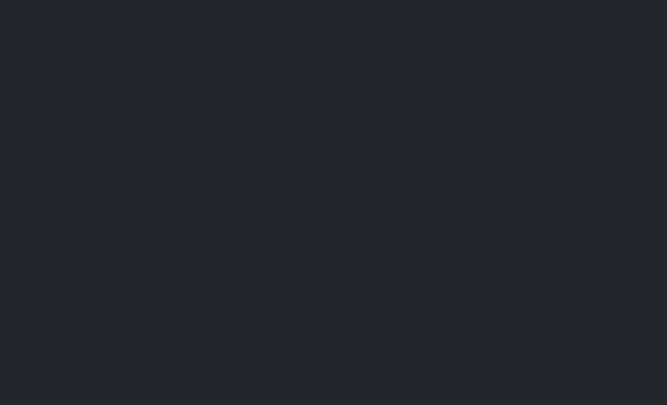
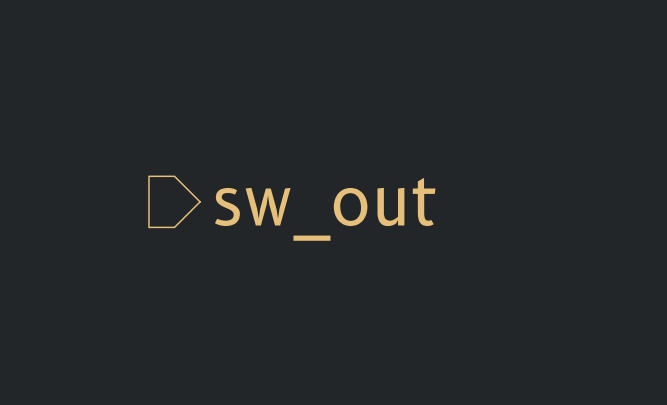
hierarchical label: none -> sw_out (325, 209)

